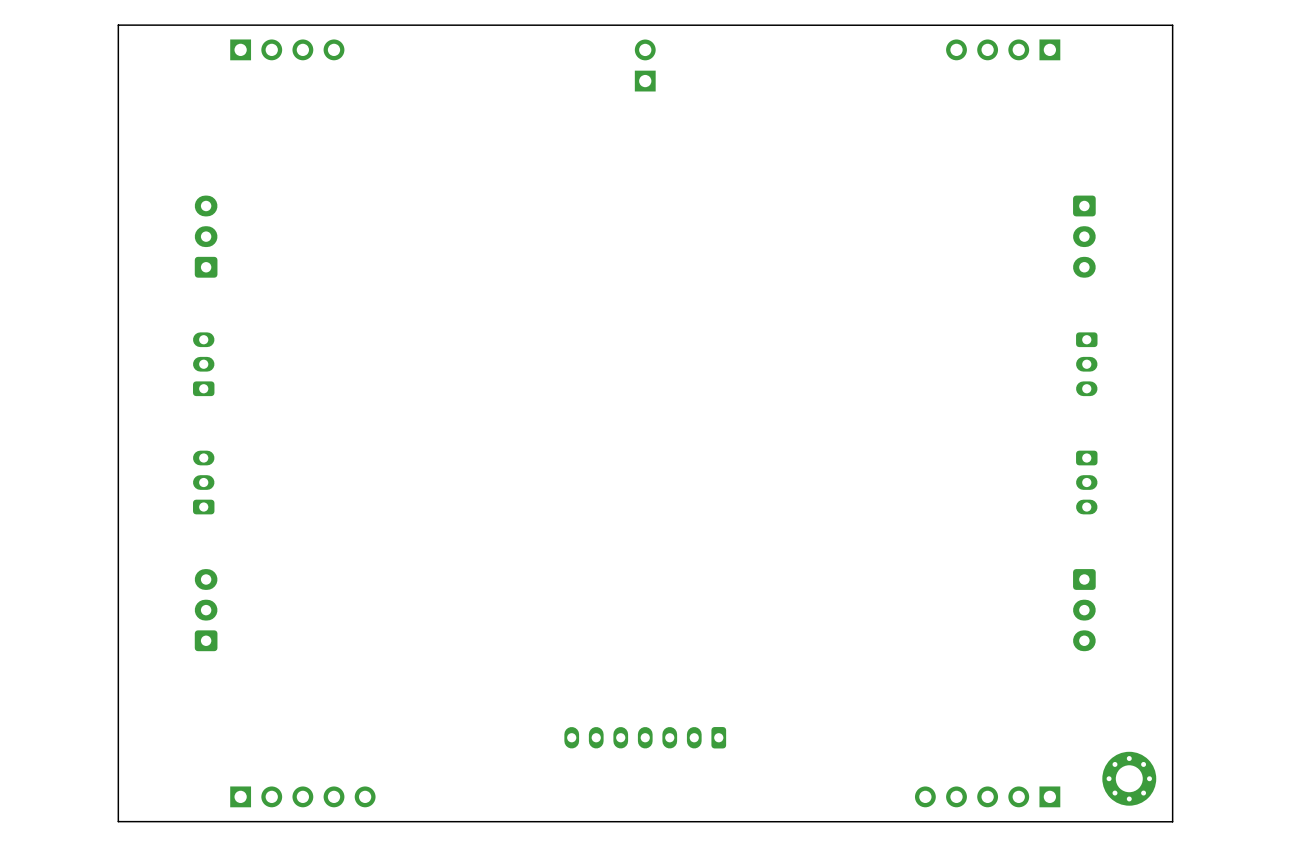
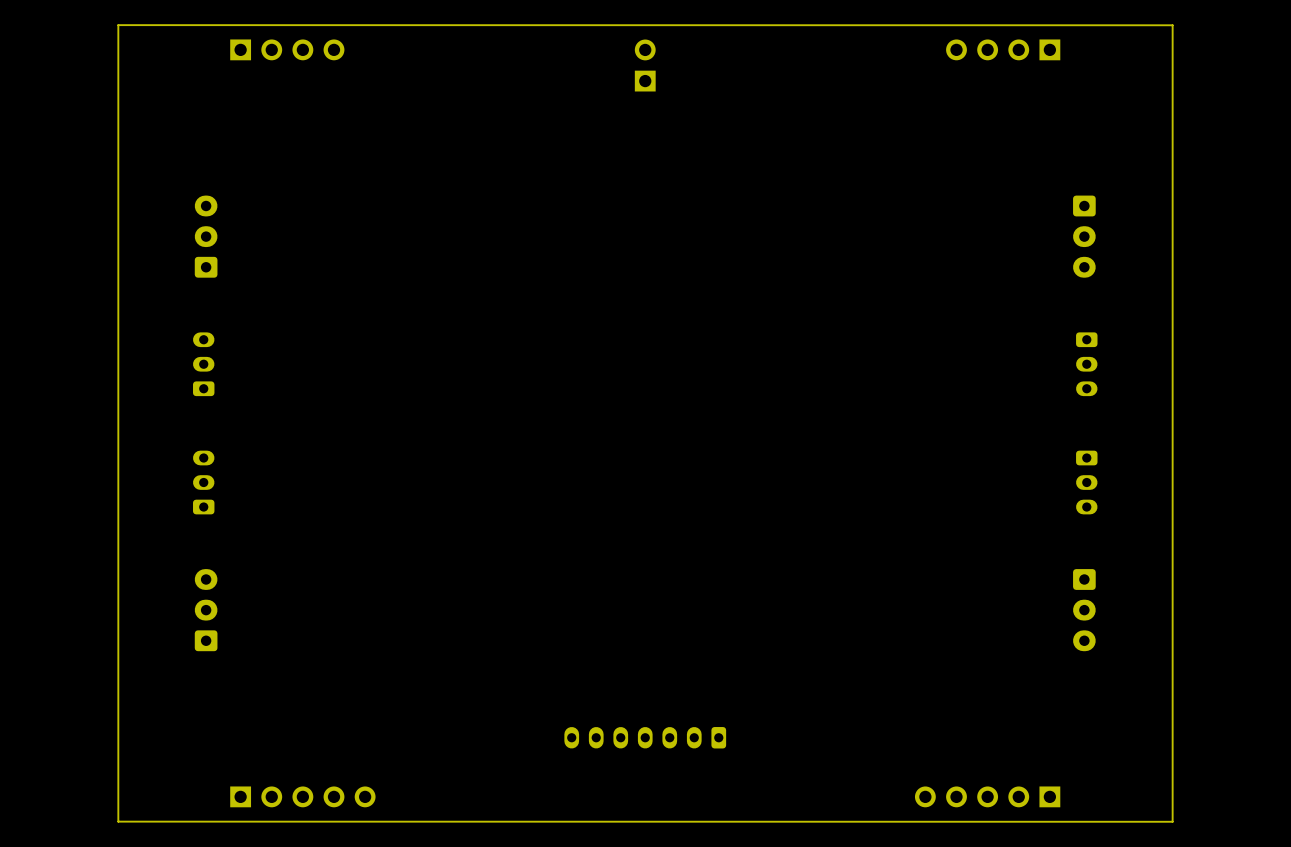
part: (1129, 778) -> none

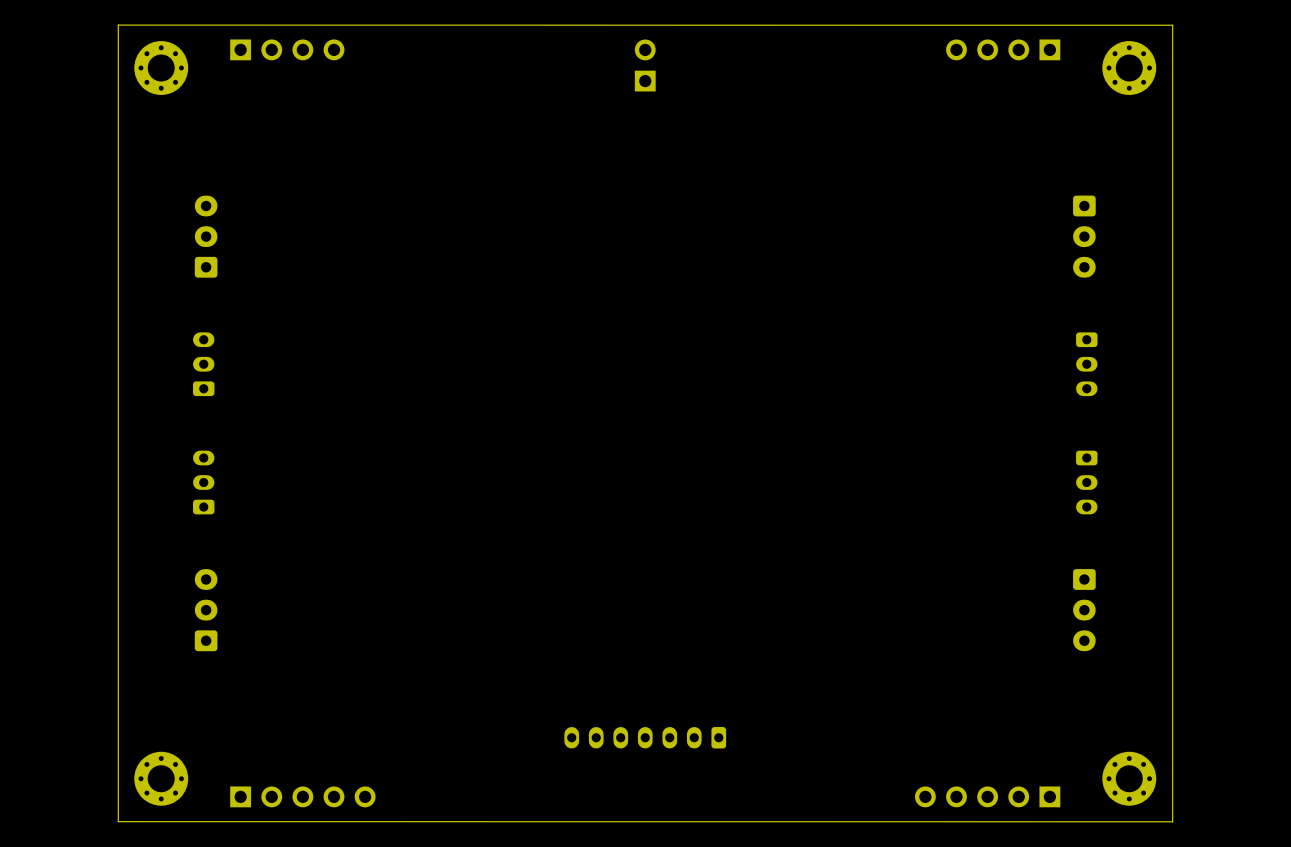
part: none -> (161, 68)
part: none -> (1129, 68)
part: none -> (161, 778)
part: none -> (1129, 778)

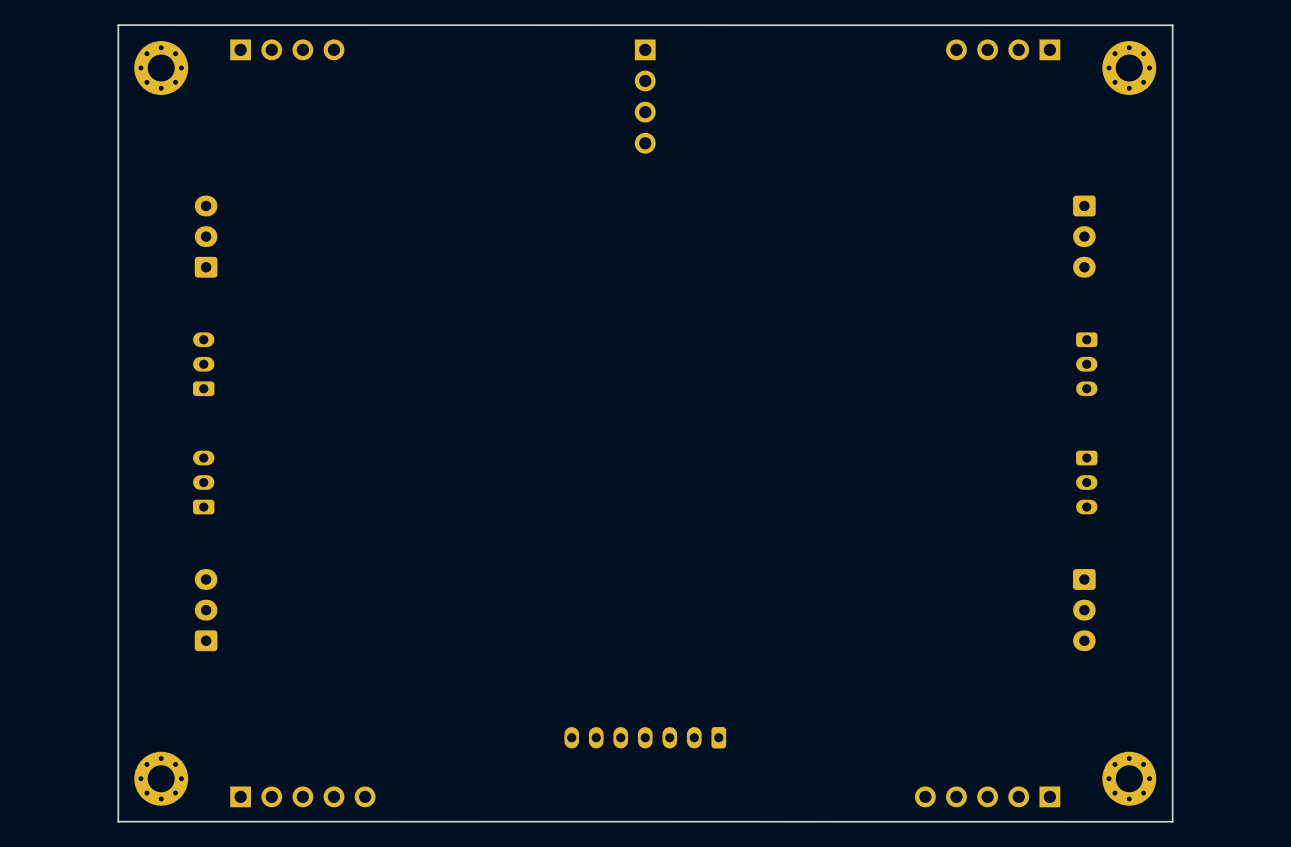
part: (645, 65) -> none
part: none -> (645, 96)

